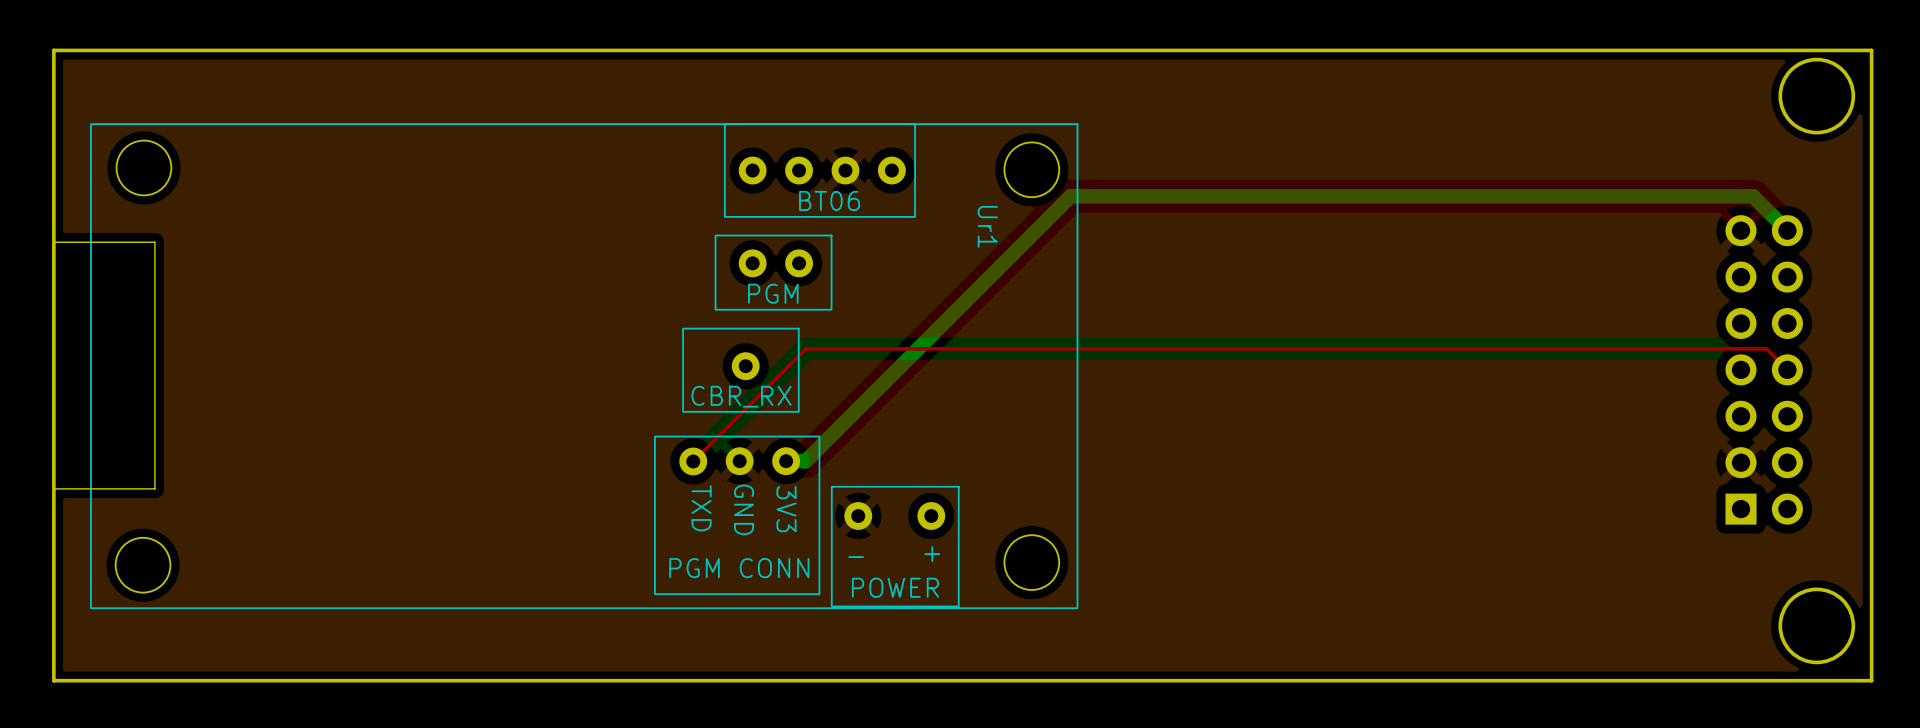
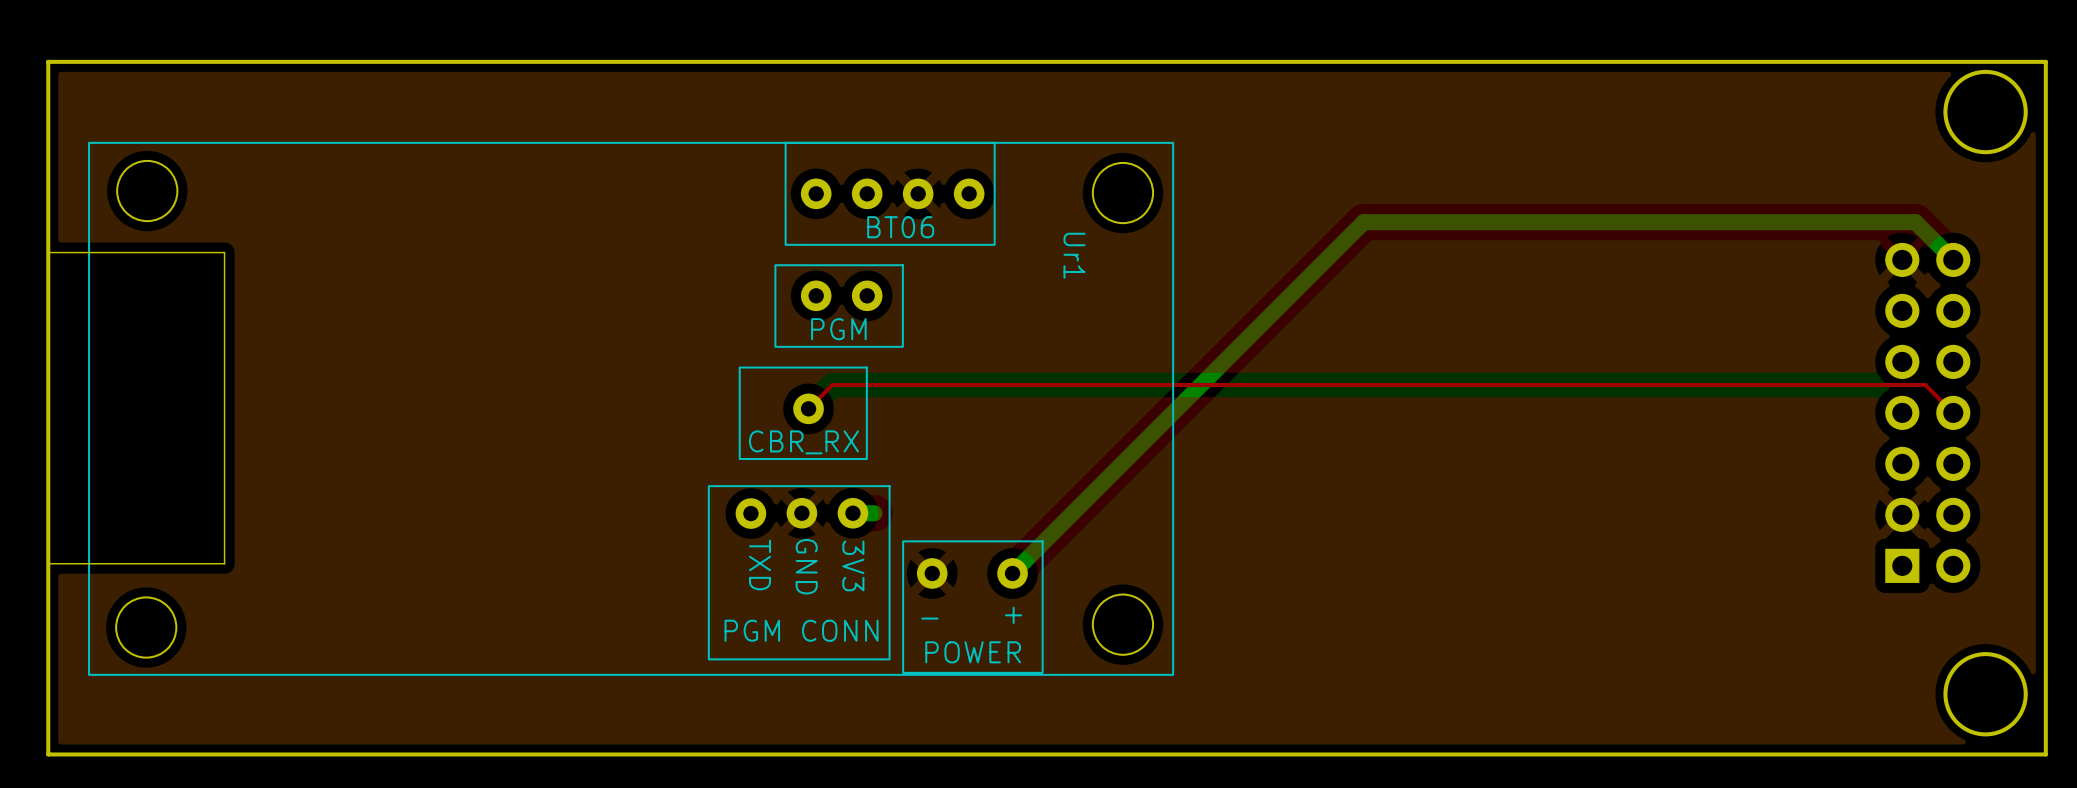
bottom track: (1251, 196) (1070, 196) (805, 461) -> (1363, 222) (1012, 573)
board edge: (53, 242) (154, 242) (154, 488) (53, 488) -> (48, 272) (48, 252) (224, 252) (224, 563) (48, 563) (48, 543)
top track: (1766, 348) (805, 348) (693, 461) -> (1930, 389) (1925, 385) (832, 385) (808, 408)

